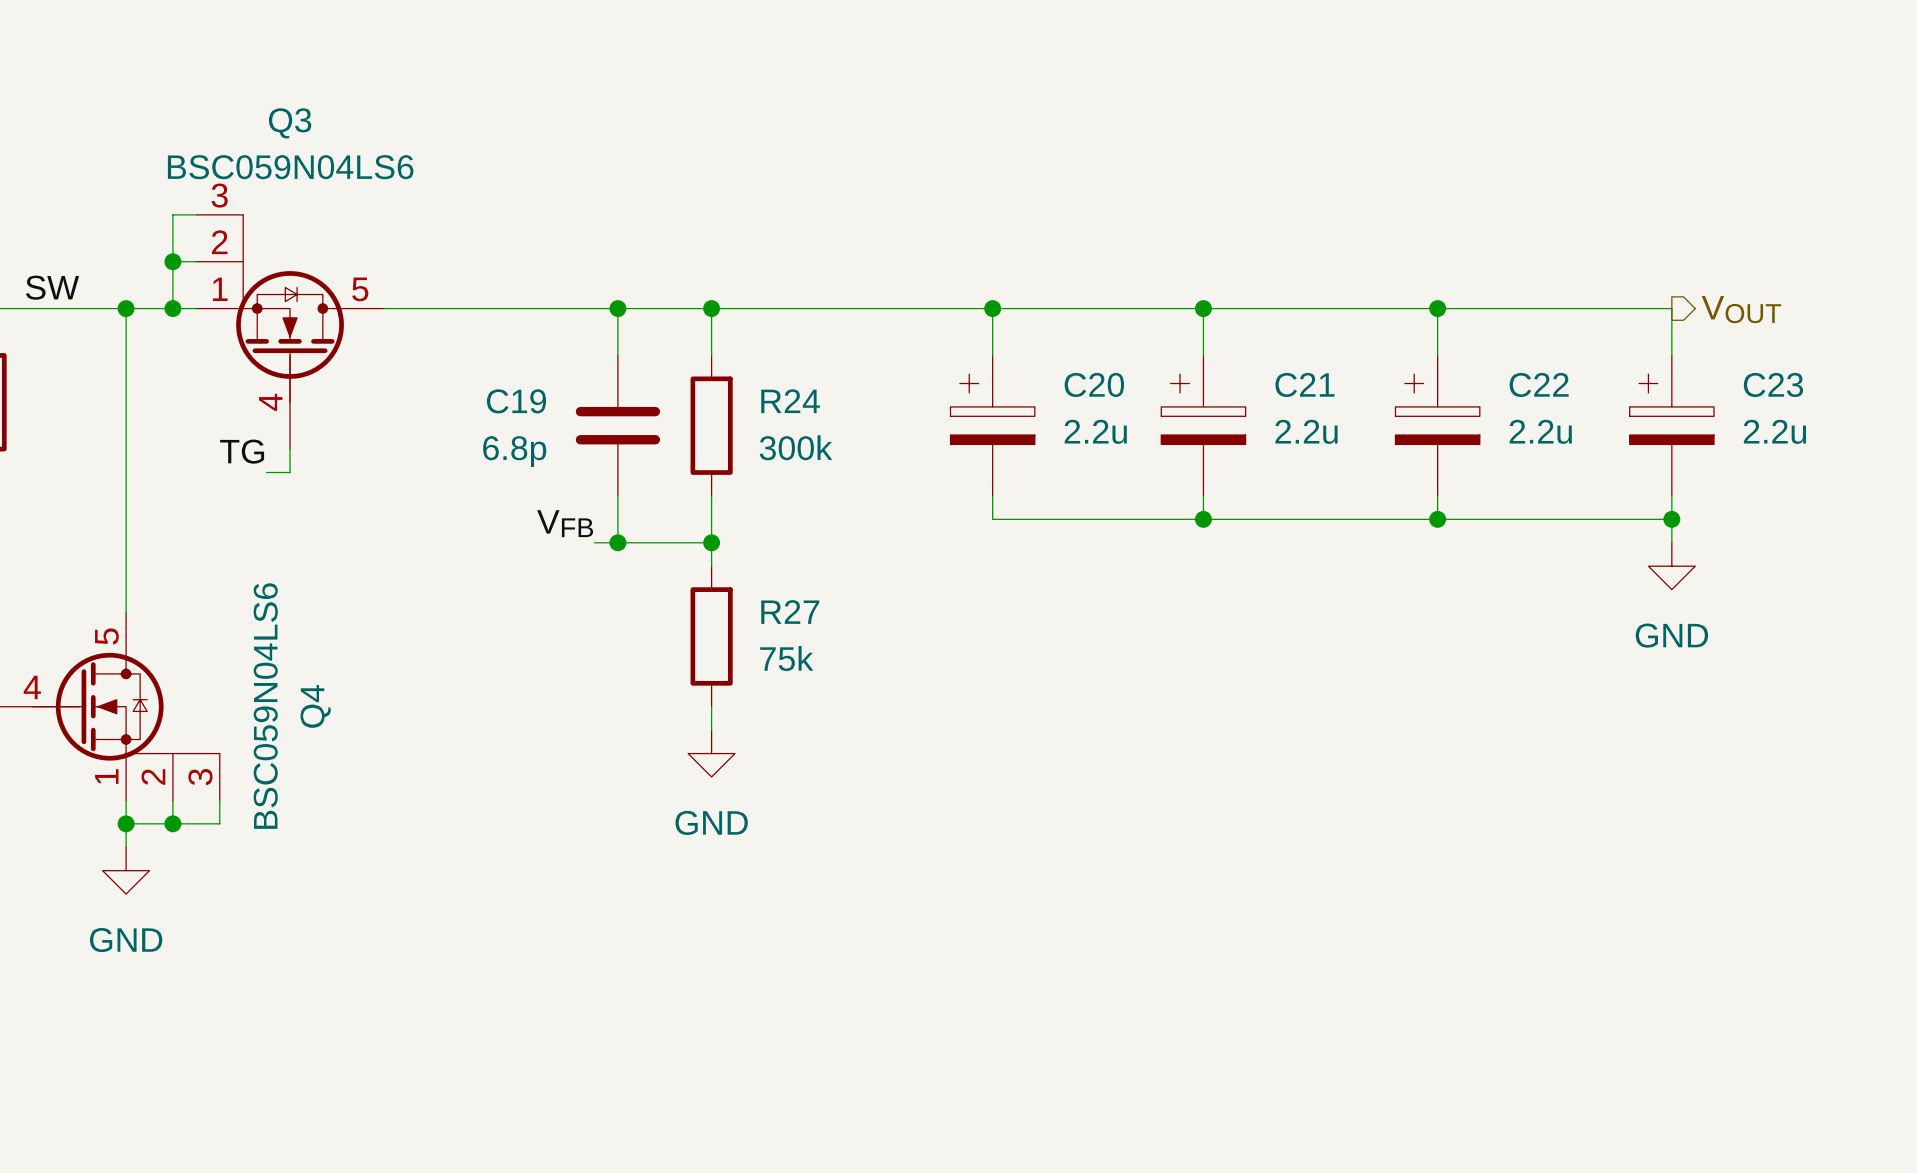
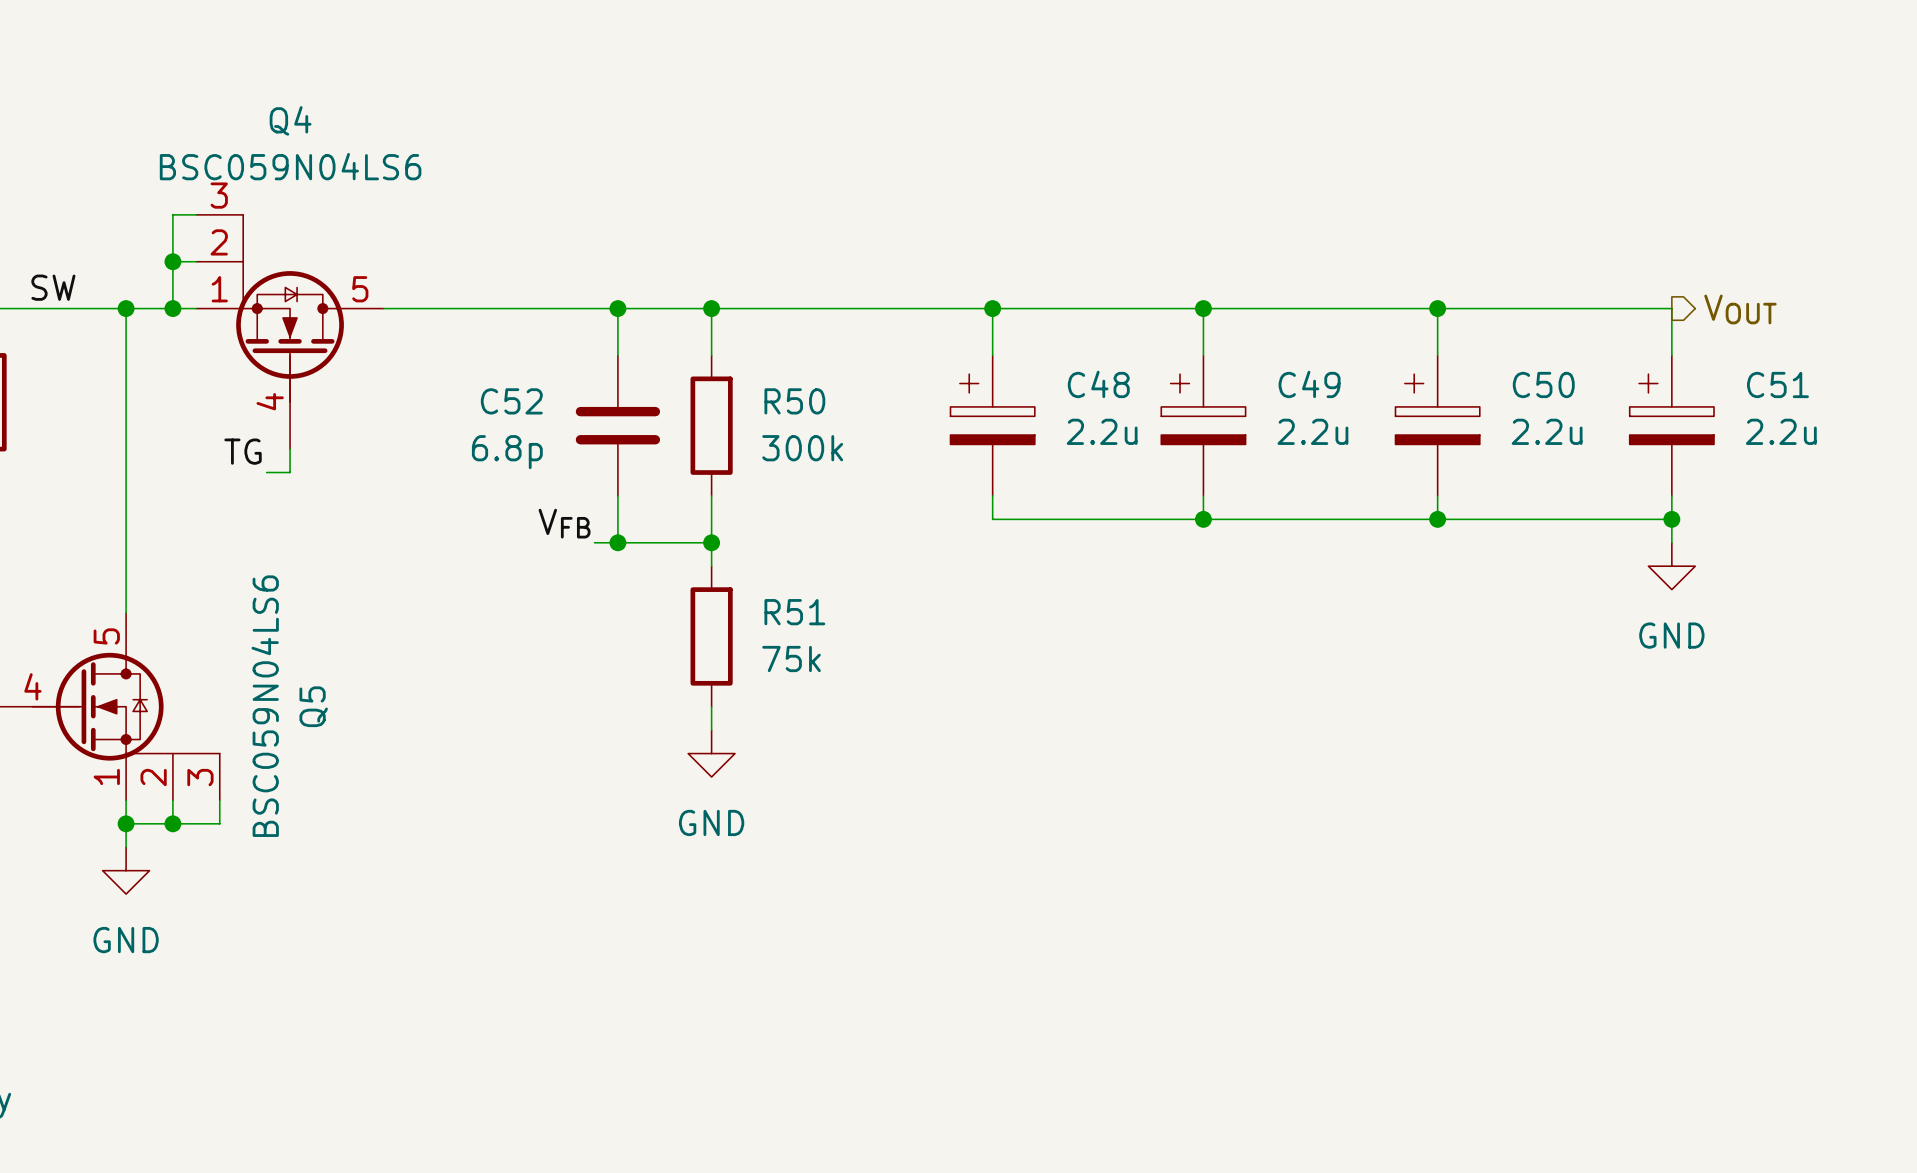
Q3 name: Q3 (290, 123) -> Q4 (290, 120)
C20 name: C20 (1094, 384) -> C48 (1098, 384)
C21 name: C21 (1304, 384) -> C49 (1309, 384)
C22 name: C22 (1539, 384) -> C50 (1543, 384)
C23 name: C23 (1773, 384) -> C51 (1777, 384)
C19 name: C19 (516, 401) -> C52 (511, 401)
R24 name: R24 (790, 401) -> R50 (794, 401)
R27 name: R27 (790, 611) -> R51 (794, 612)
Q4 name: Q4 (315, 706) -> Q5 (313, 706)

